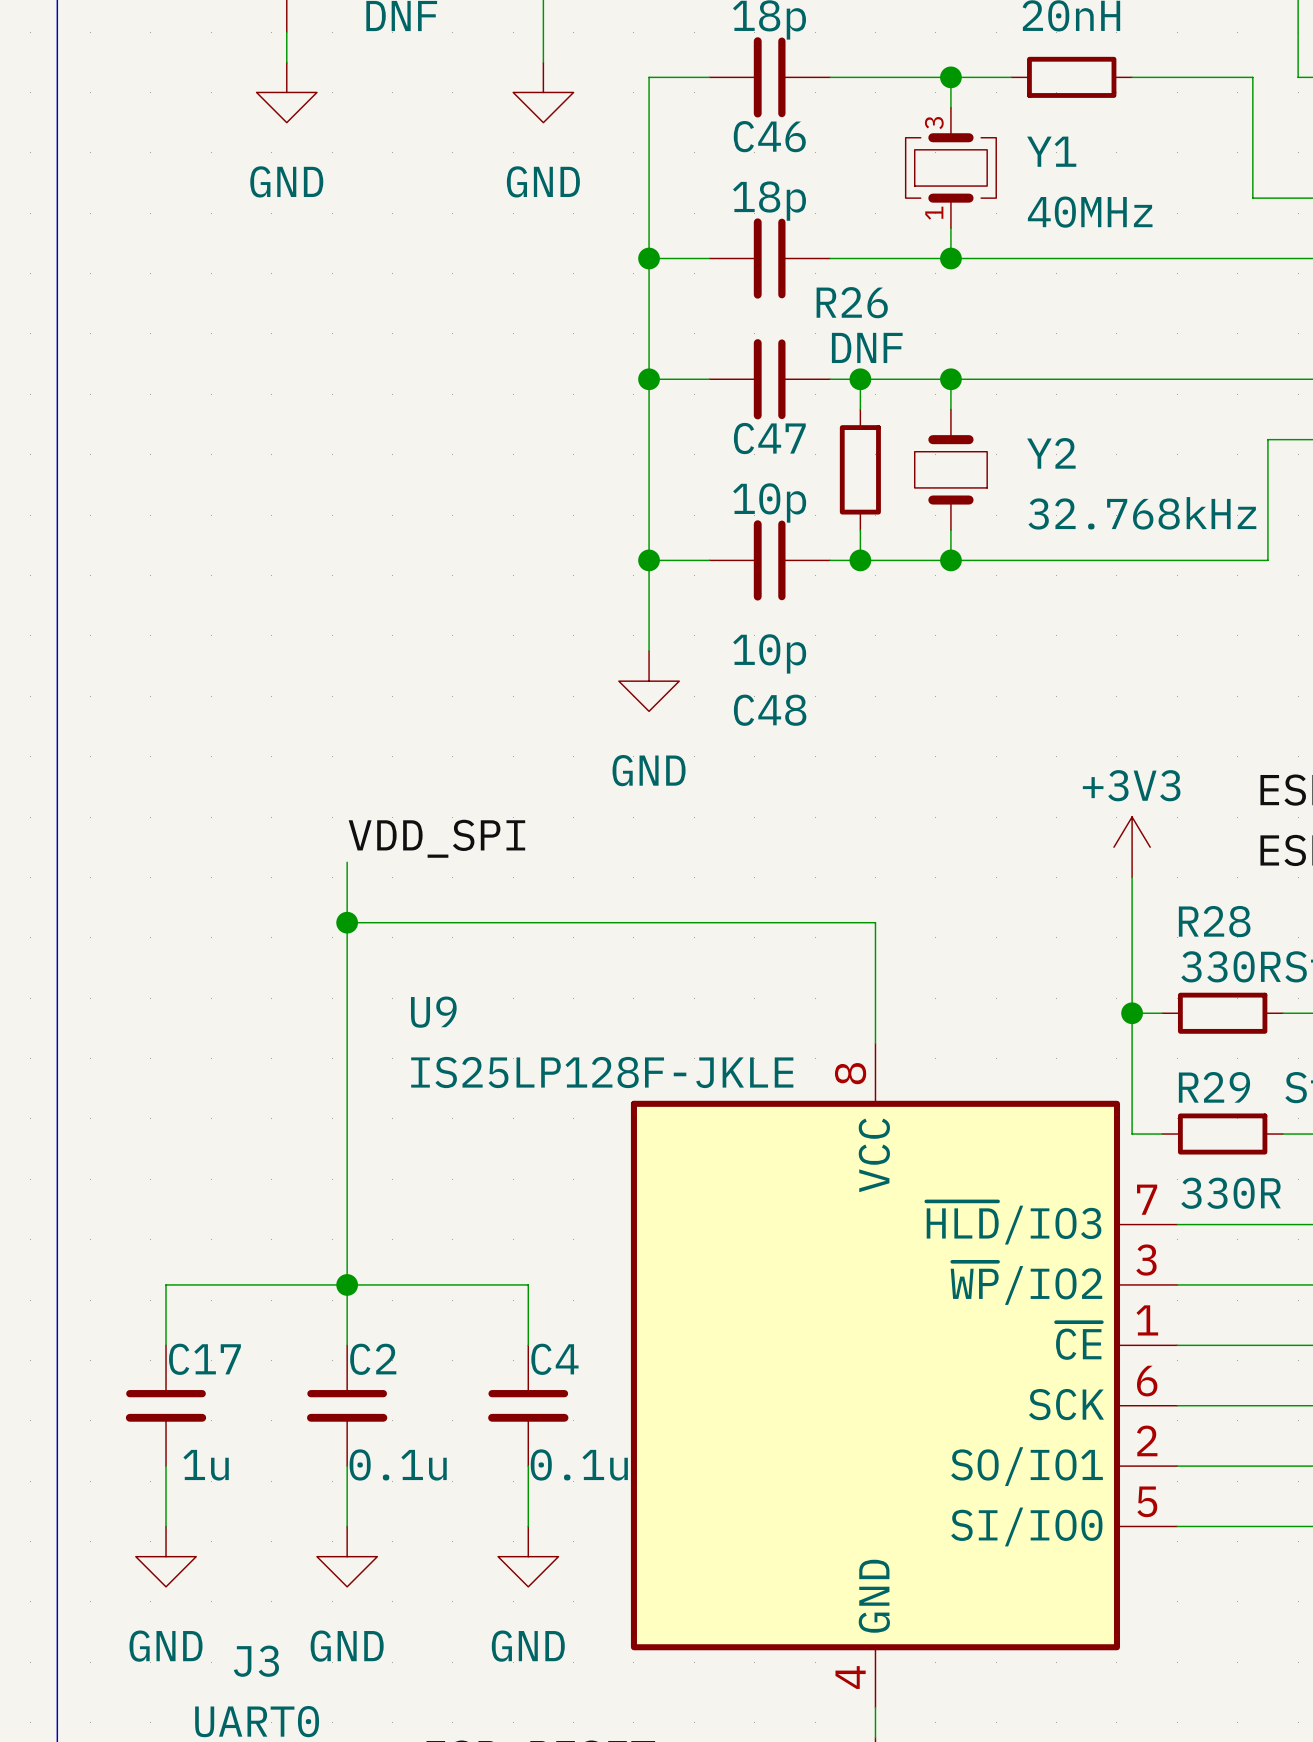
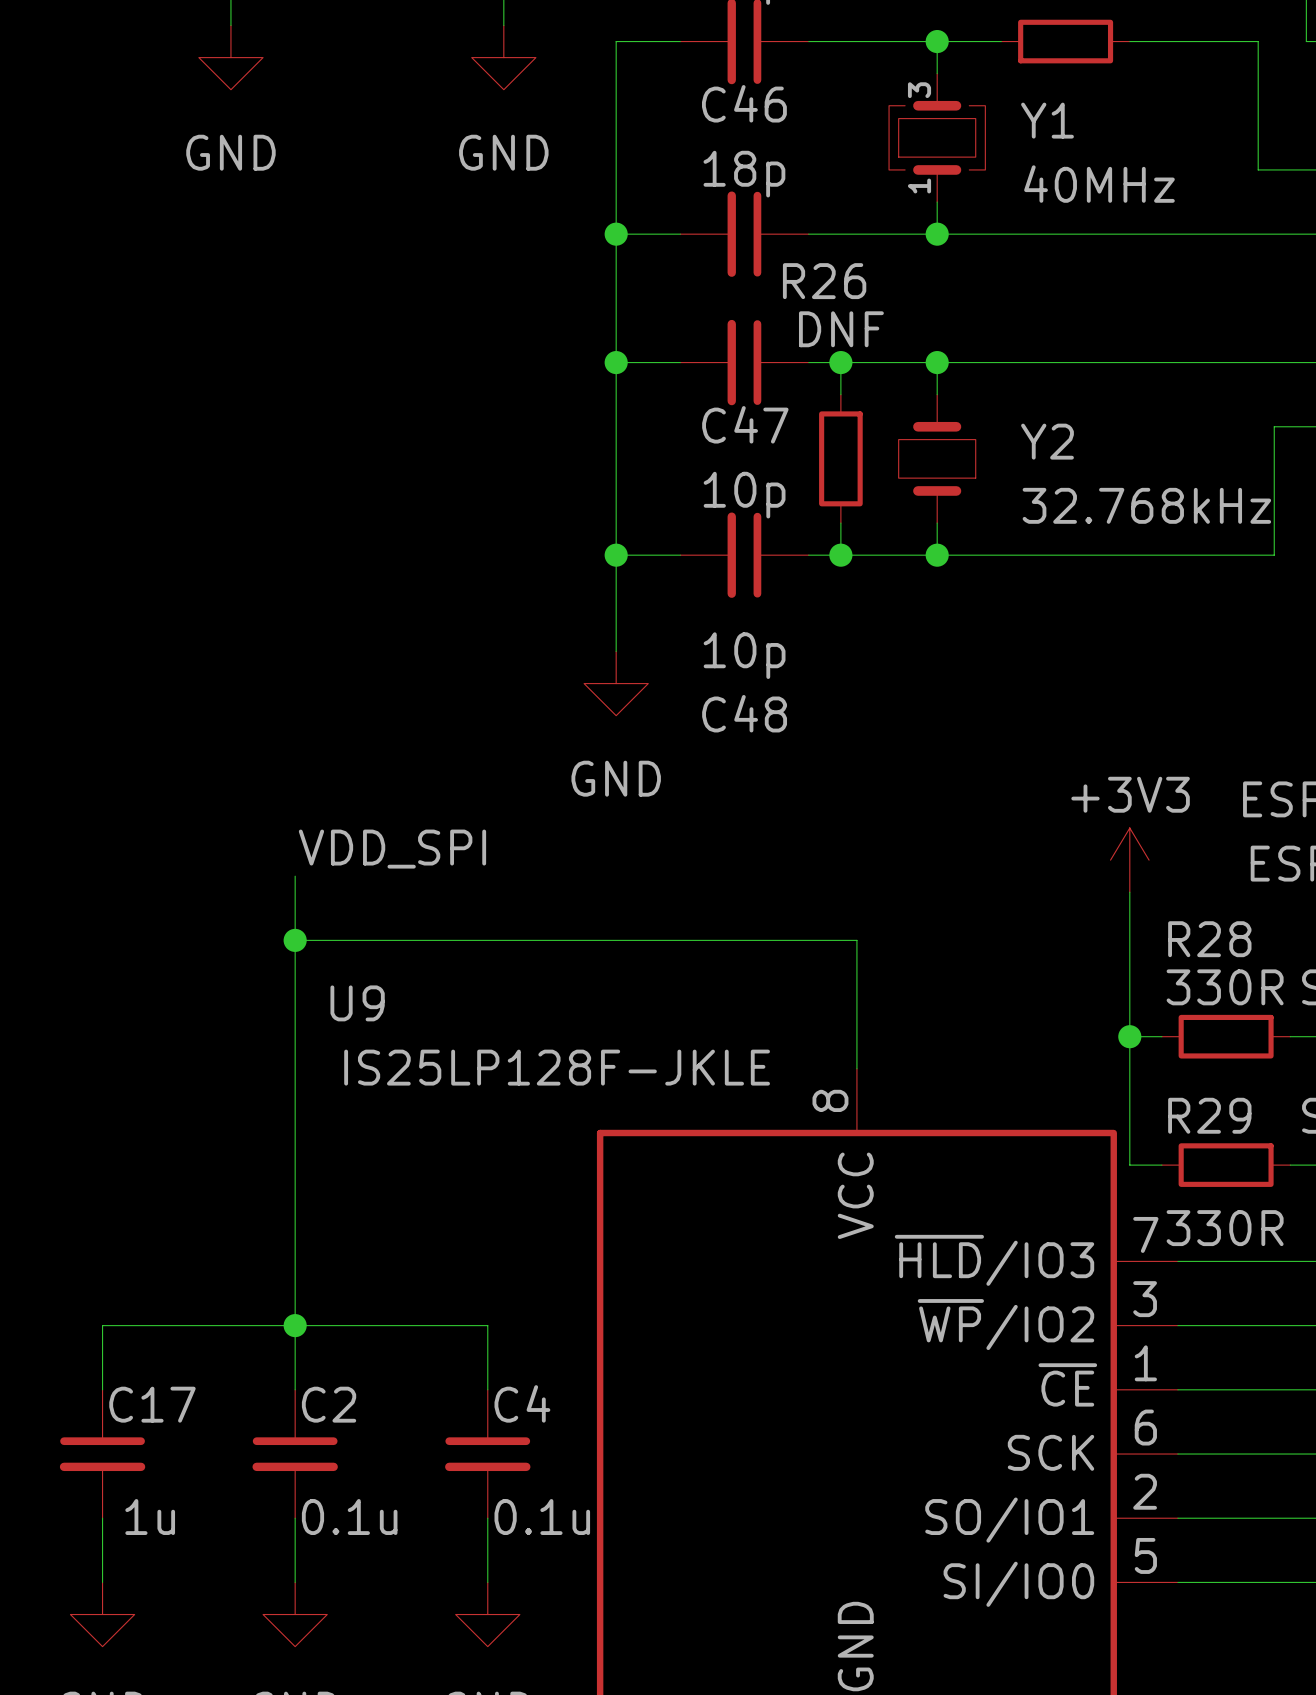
U9 name position: U9 (433, 1012) -> U9 (357, 1003)
U9 value position: IS25LP128F-JKLE (602, 1072) -> IS25LP128F-JKLE (557, 1067)

